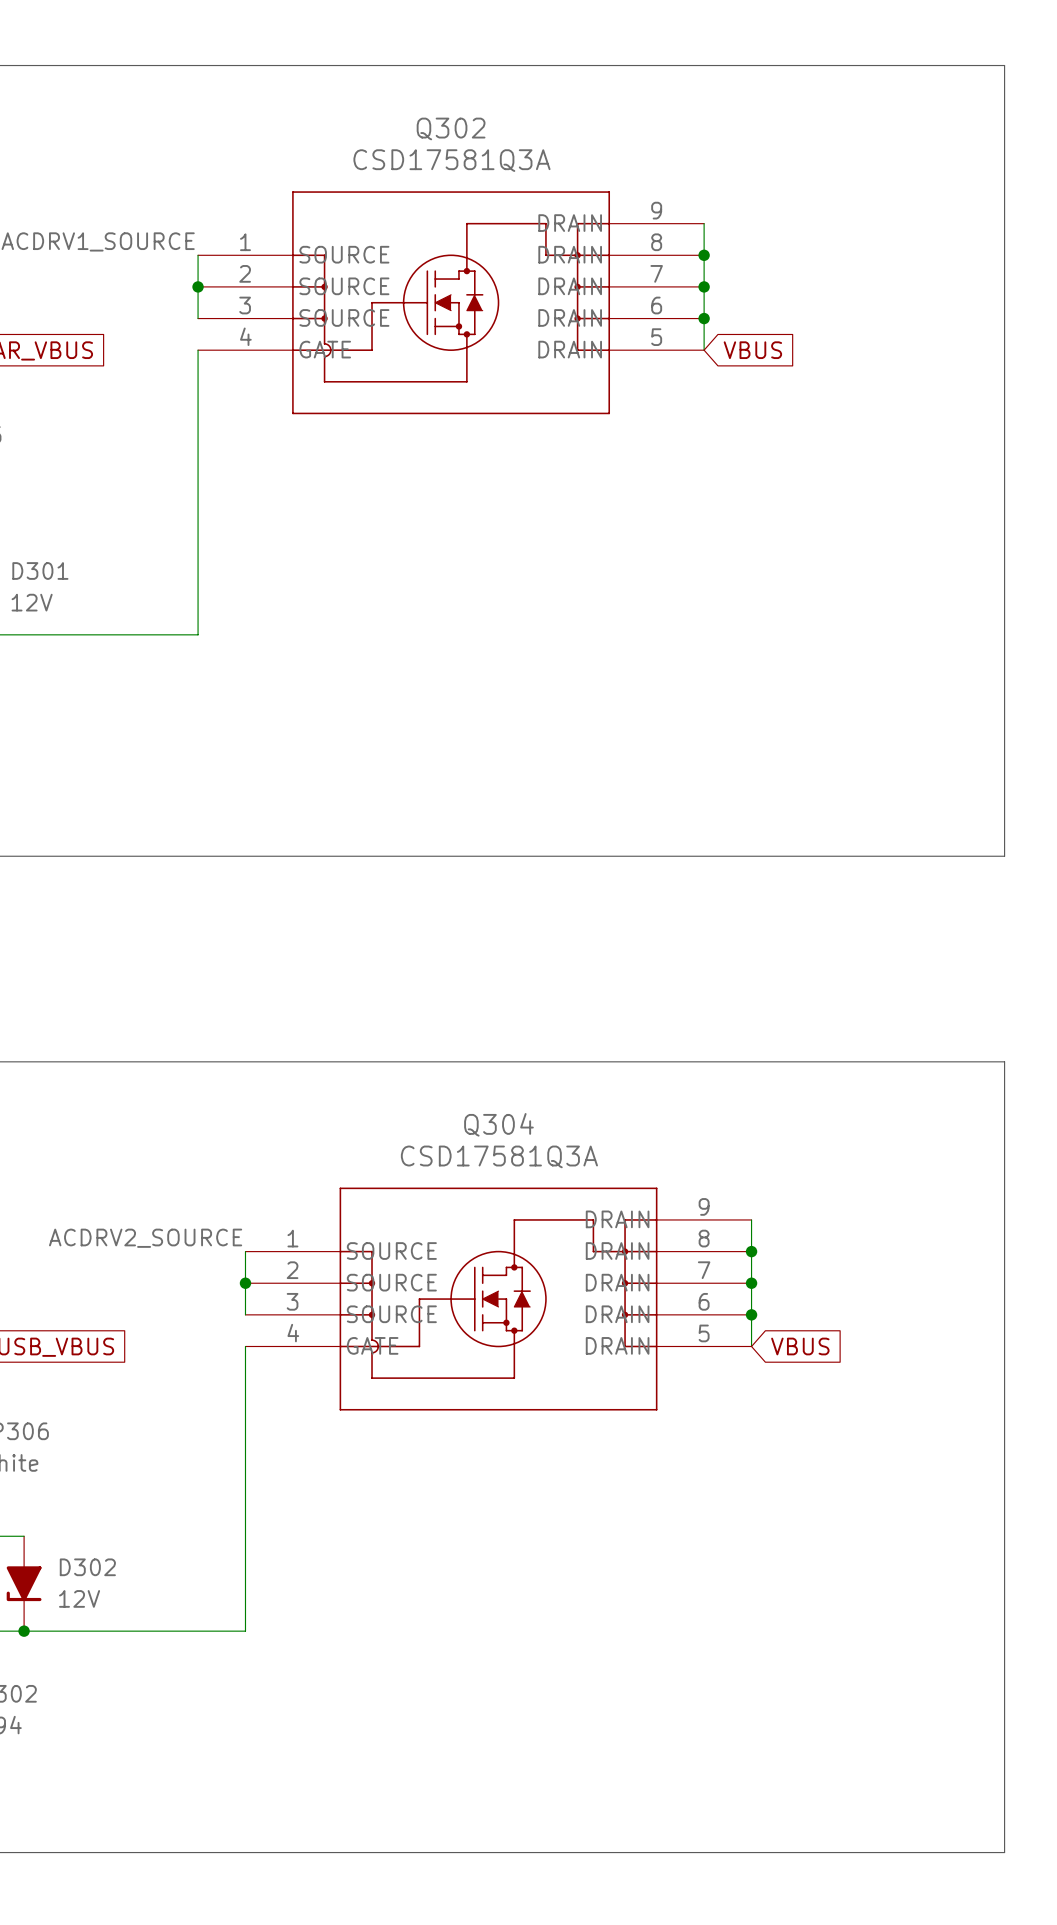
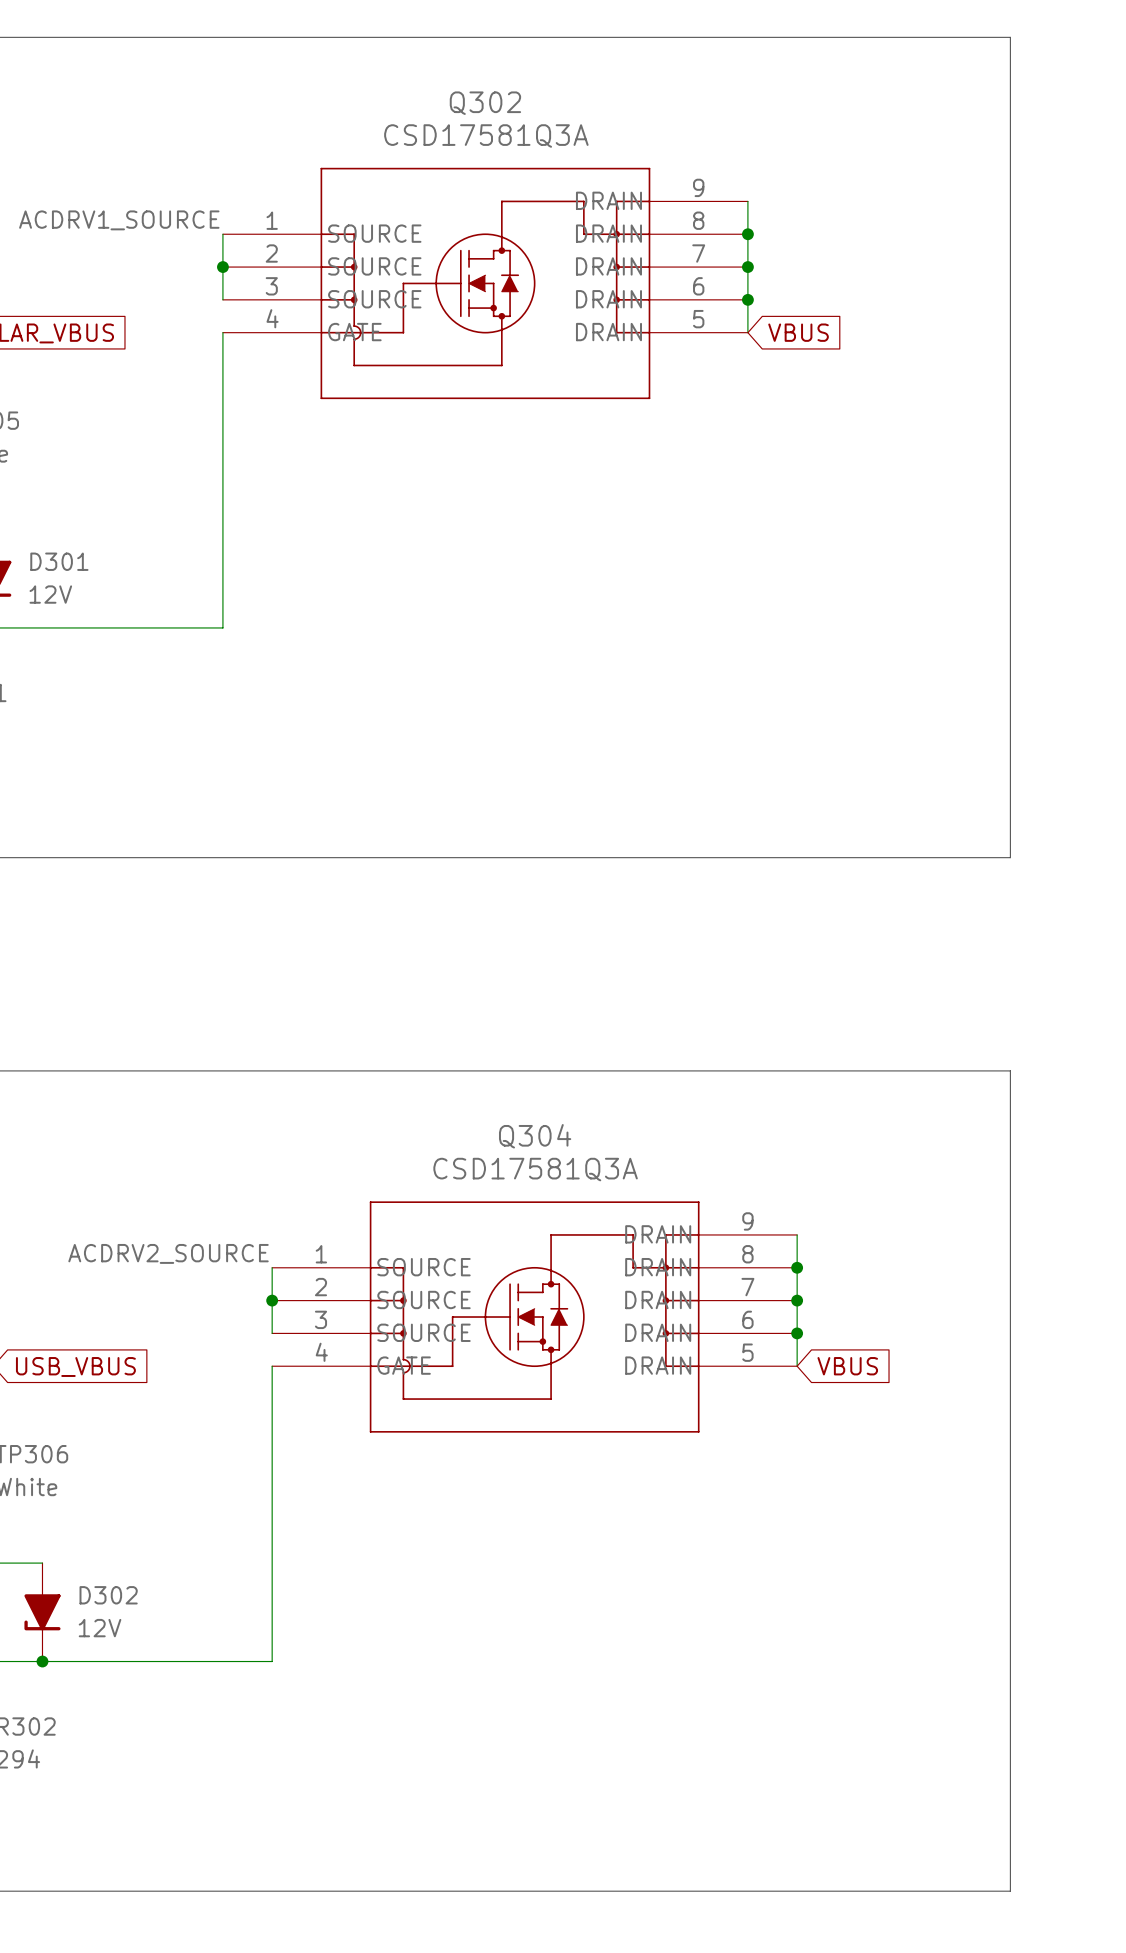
line: (957, 65) (1004, 65) (1004, 856) (957, 856) -> (1010, 37) (1010, 857)
line: (957, 1061) (1004, 1061) (1004, 1852) (957, 1852) -> (1010, 1070) (1010, 1891)

